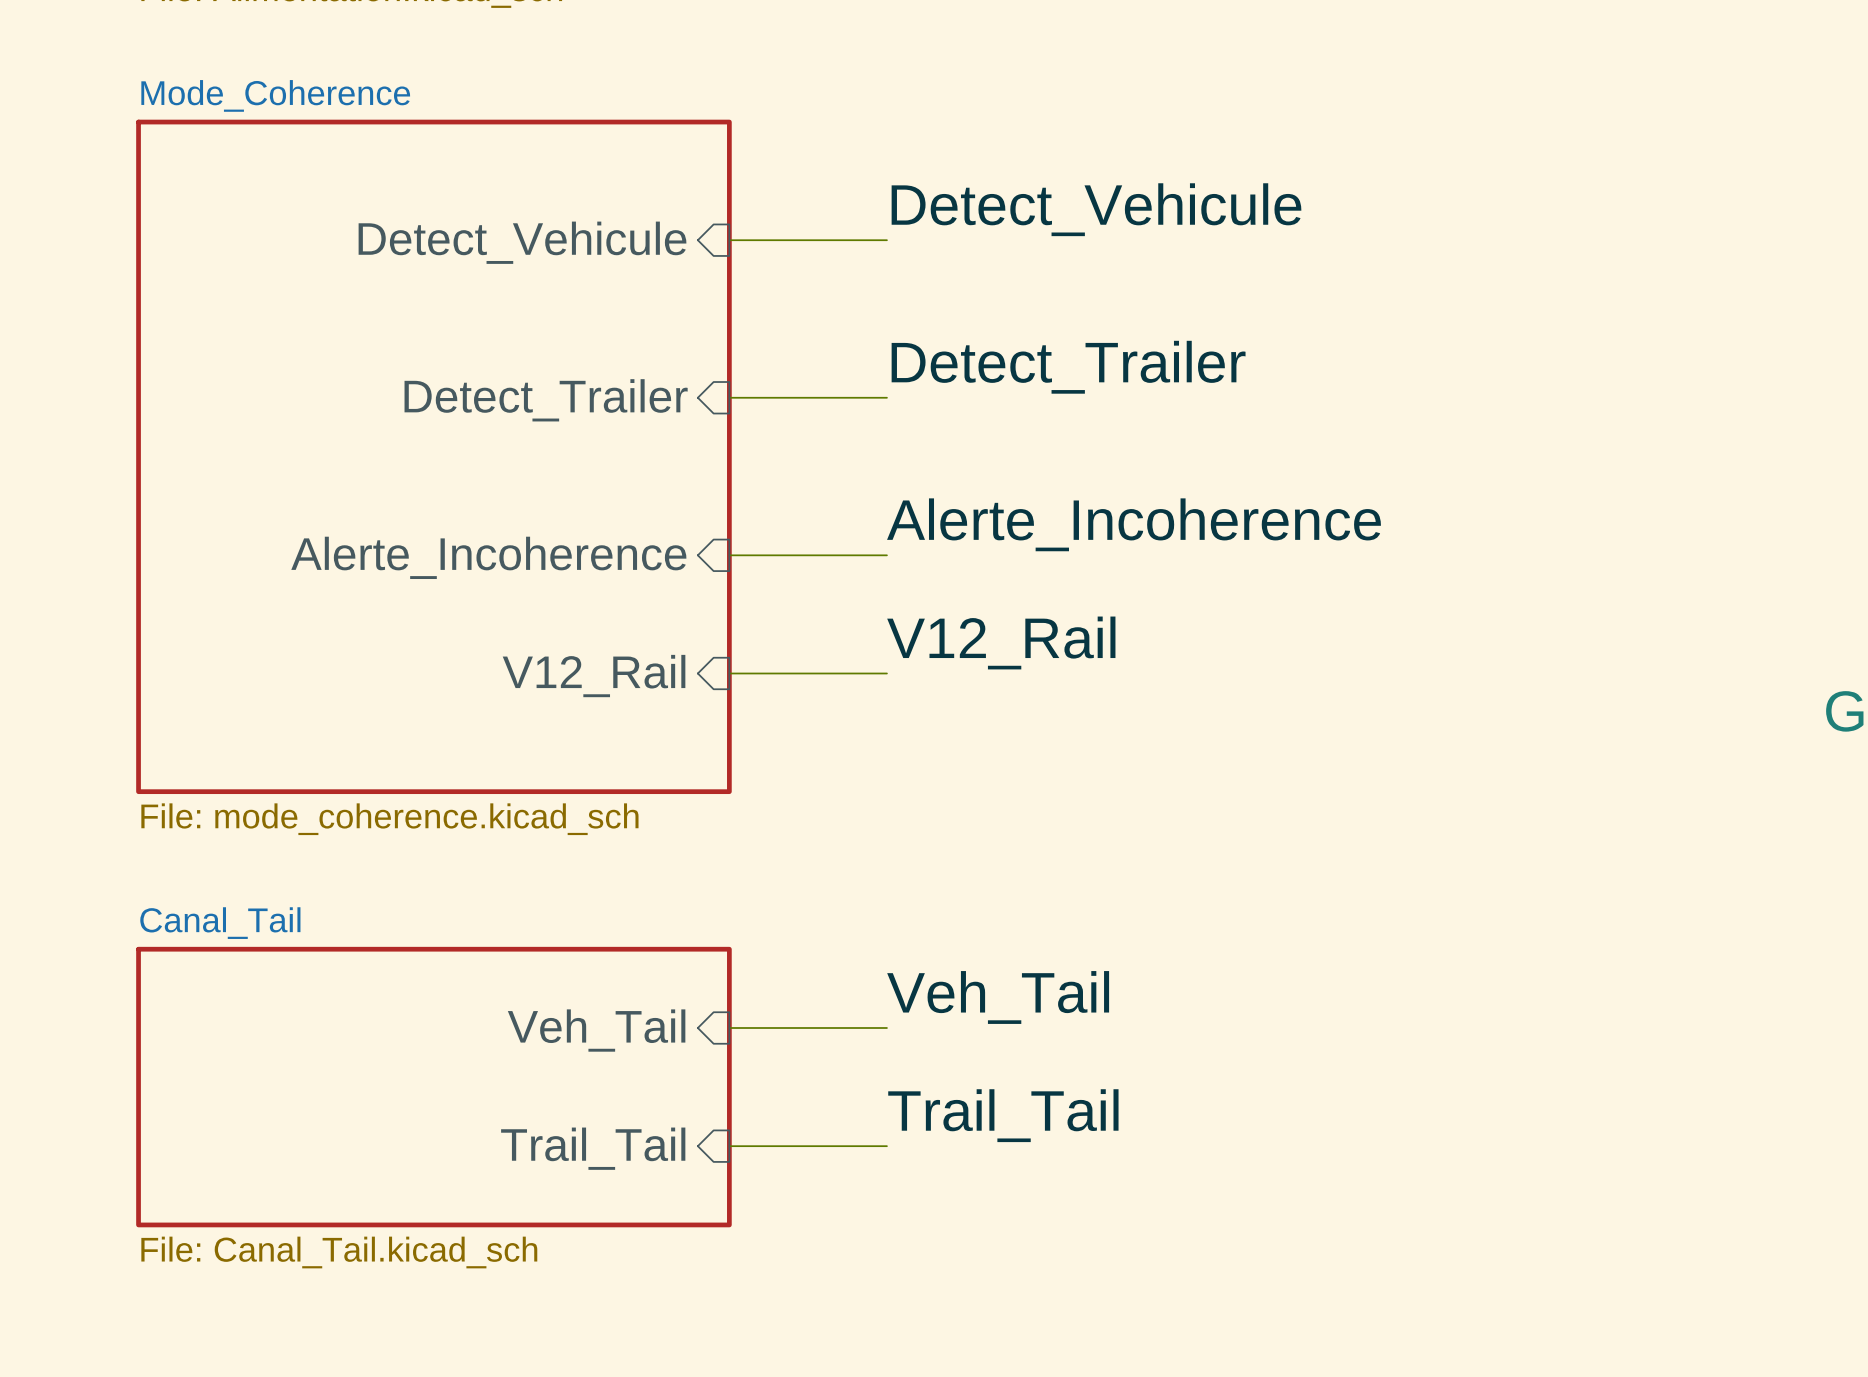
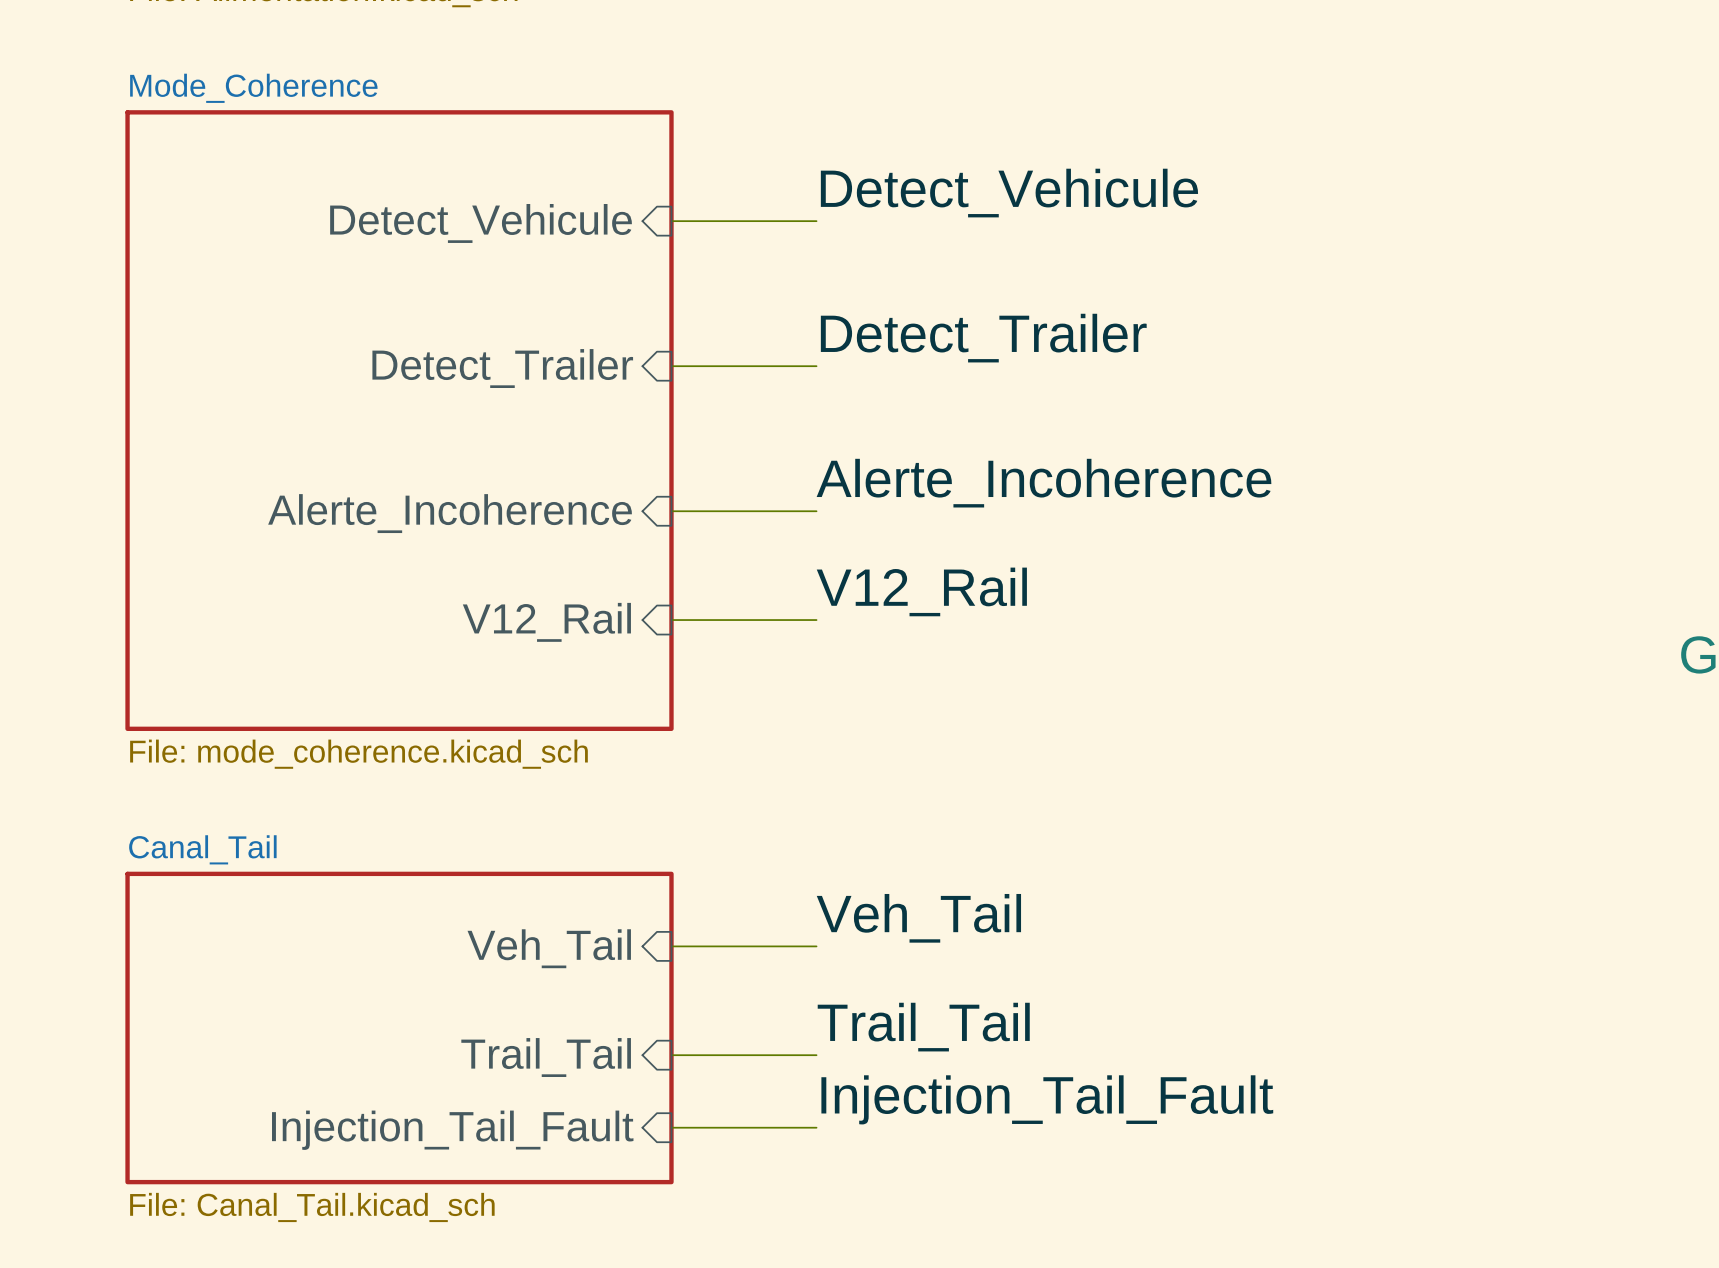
sheet Canal_Tail shape: [136, 946, 732, 1228] -> [125, 871, 674, 1185]
label: none -> Injection_Tail_Fault (1047, 1099)
wire: none -> (671, 1127) (816, 1127)
sheet pin: none -> Injection_Tail_Fault (452, 1130)

